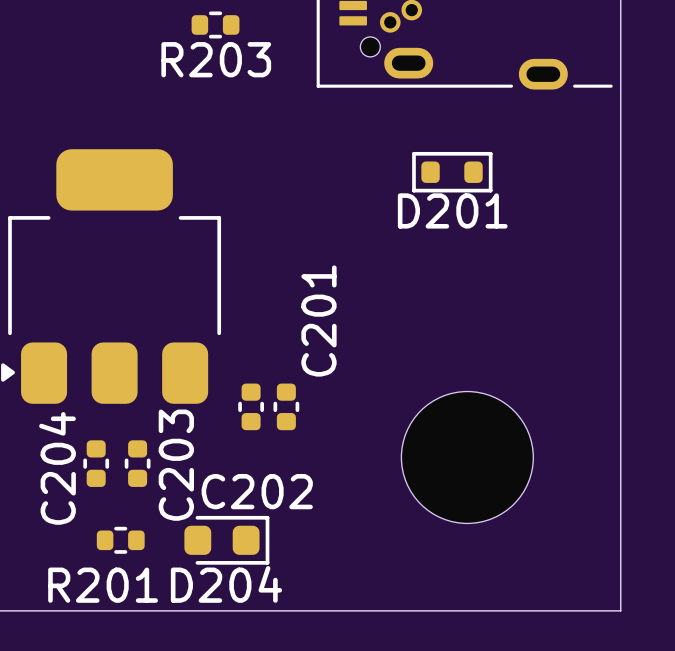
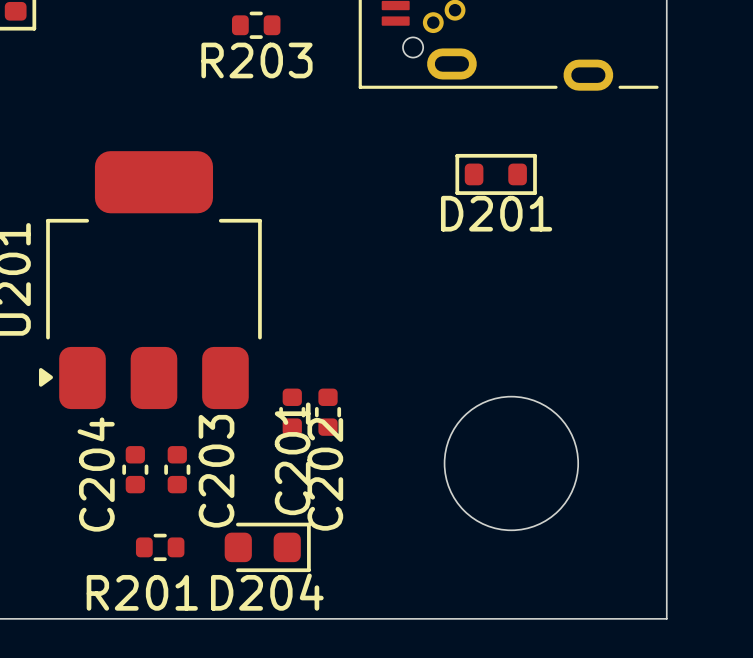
C201 name position: C201 (318, 320) -> C201 (292, 458)
C202 name rotation: 0° (257, 491) -> 90° counterclockwise (325, 474)

